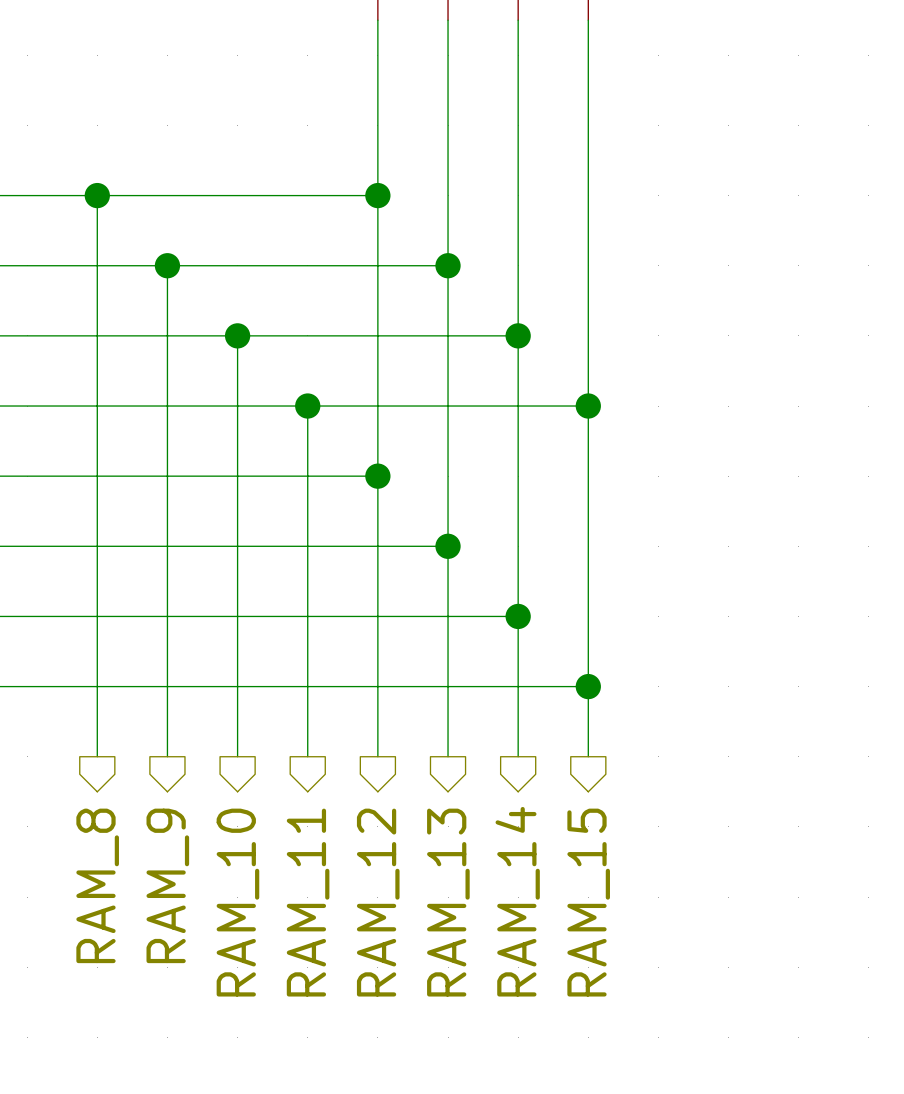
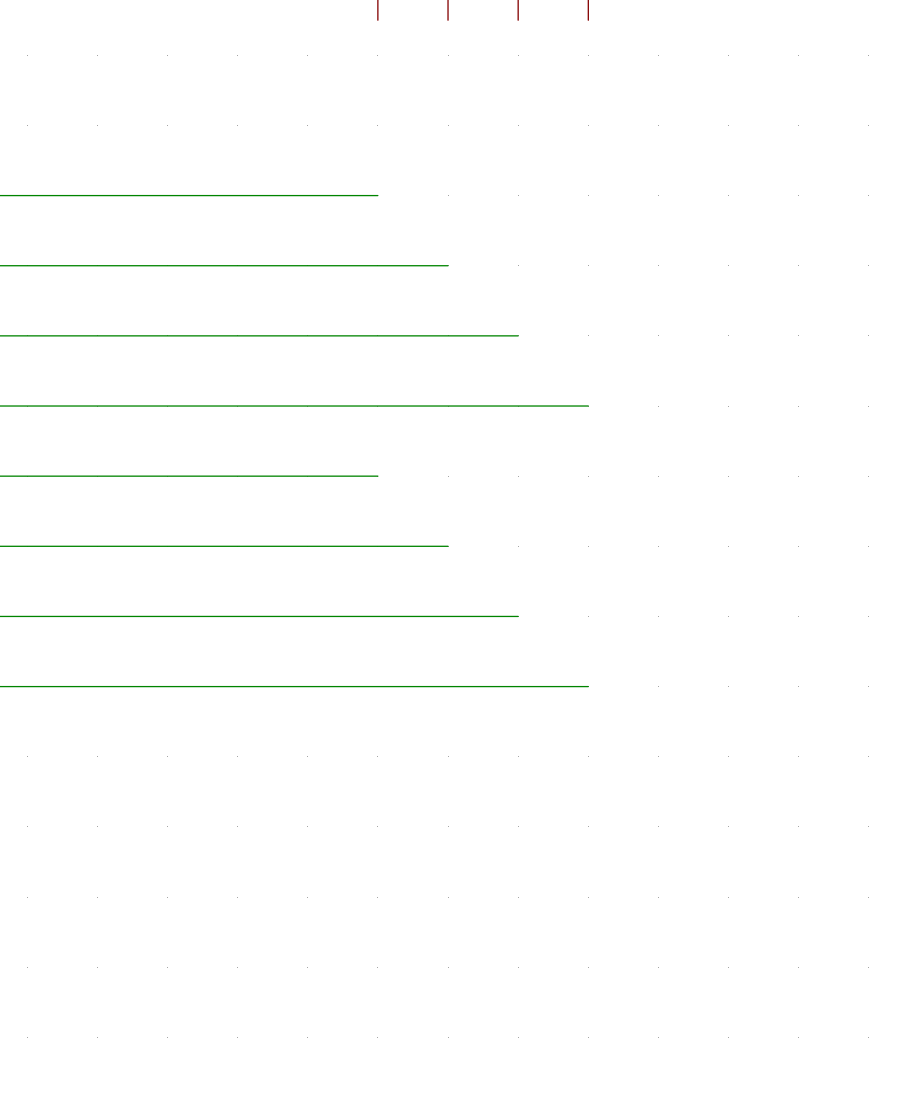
wire: (377, 20) (377, 756) -> none
wire: (448, 20) (448, 756) -> none
wire: (518, 20) (518, 756) -> none
wire: (588, 20) (588, 756) -> none
wire: (97, 195) (97, 756) -> none
junction: (97, 195) -> none
junction: (377, 195) -> none
wire: (167, 265) (167, 756) -> none
junction: (167, 265) -> none
junction: (448, 265) -> none
wire: (237, 335) (237, 756) -> none
junction: (237, 335) -> none
junction: (518, 335) -> none
wire: (307, 406) (307, 756) -> none
junction: (307, 406) -> none
junction: (588, 406) -> none
junction: (377, 476) -> none
junction: (448, 546) -> none
junction: (518, 616) -> none
junction: (588, 686) -> none
hierarchical label: RAM_8 (97, 885) -> none
hierarchical label: RAM_9 (167, 885) -> none
hierarchical label: RAM_14 (517, 901) -> none
hierarchical label: RAM_10 (237, 902) -> none
hierarchical label: RAM_11 (308, 902) -> none
hierarchical label: RAM_12 (378, 902) -> none
hierarchical label: RAM_13 (448, 902) -> none
hierarchical label: RAM_15 (588, 902) -> none

